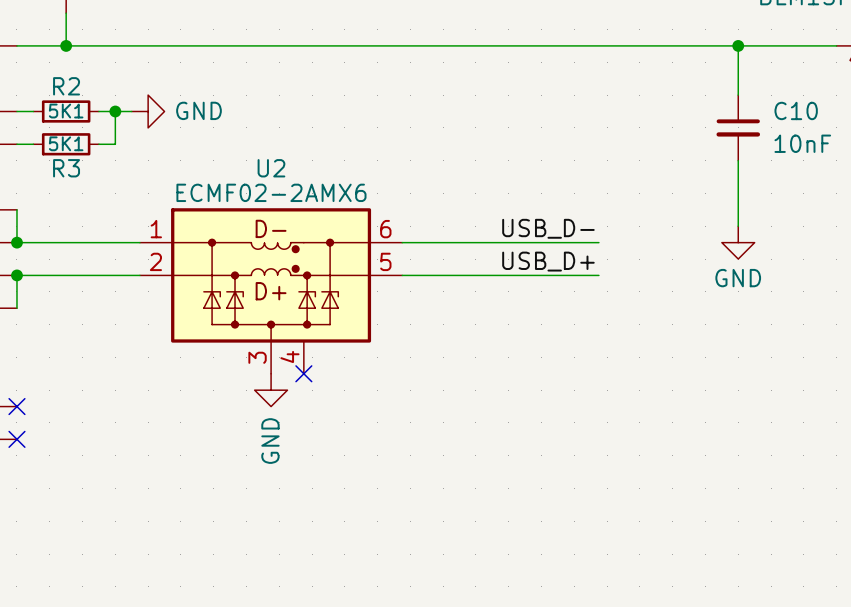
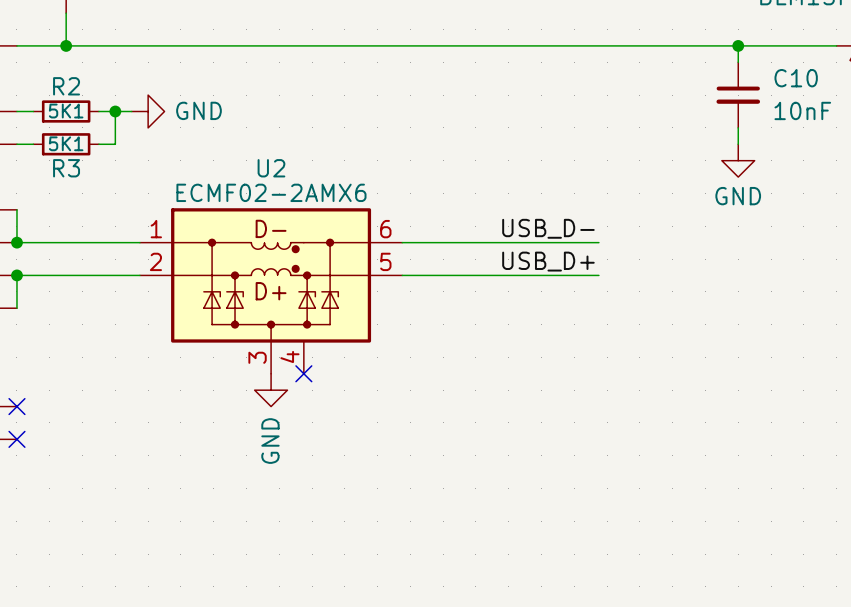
C10 position: (738, 127) -> (738, 95)
wire: (738, 160) (738, 226) -> none
power symbol position: GND (738, 242) -> GND (738, 160)

